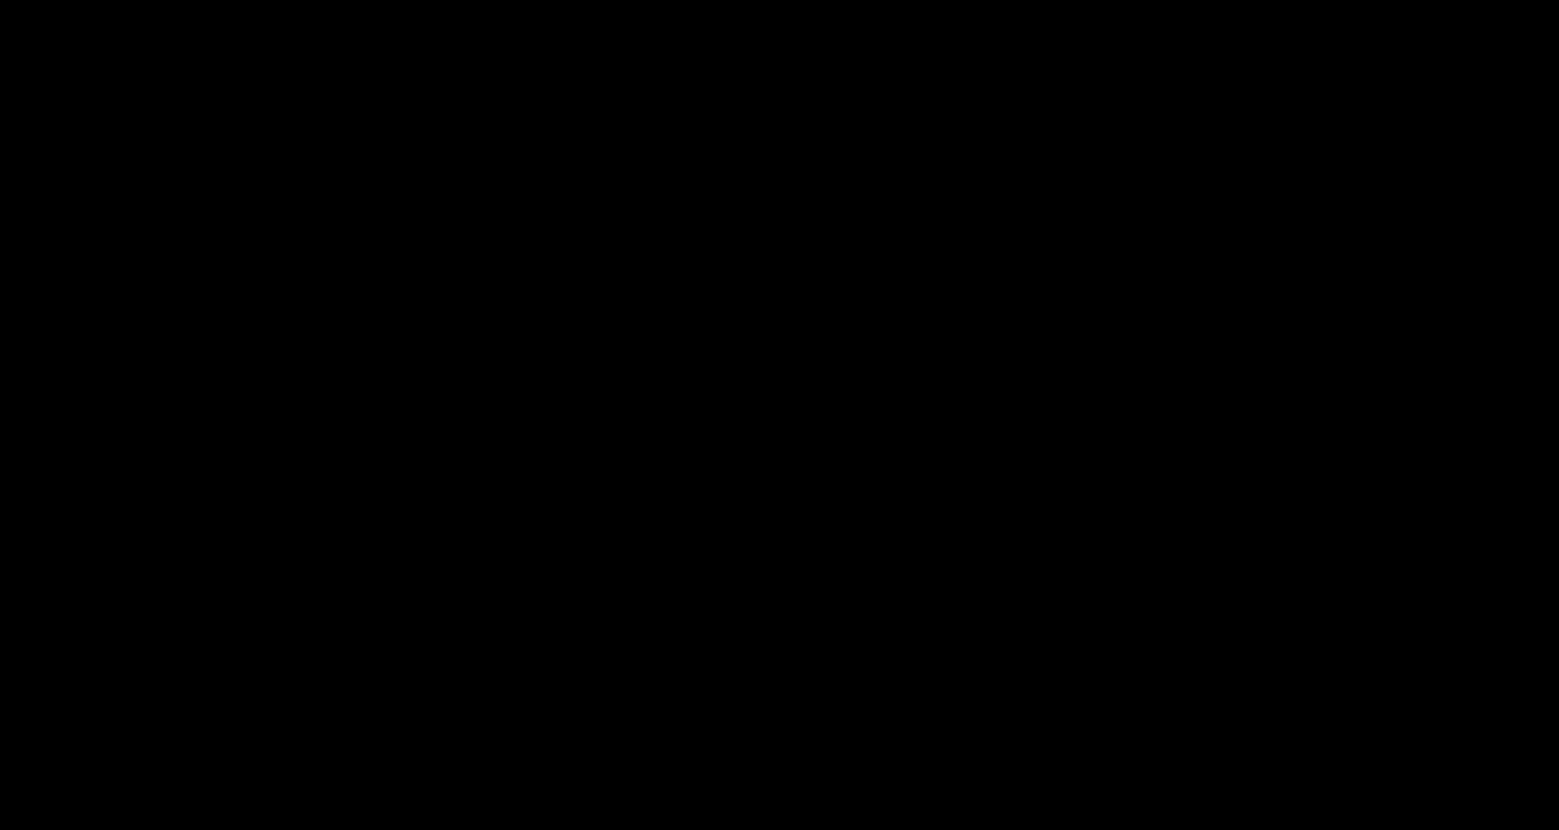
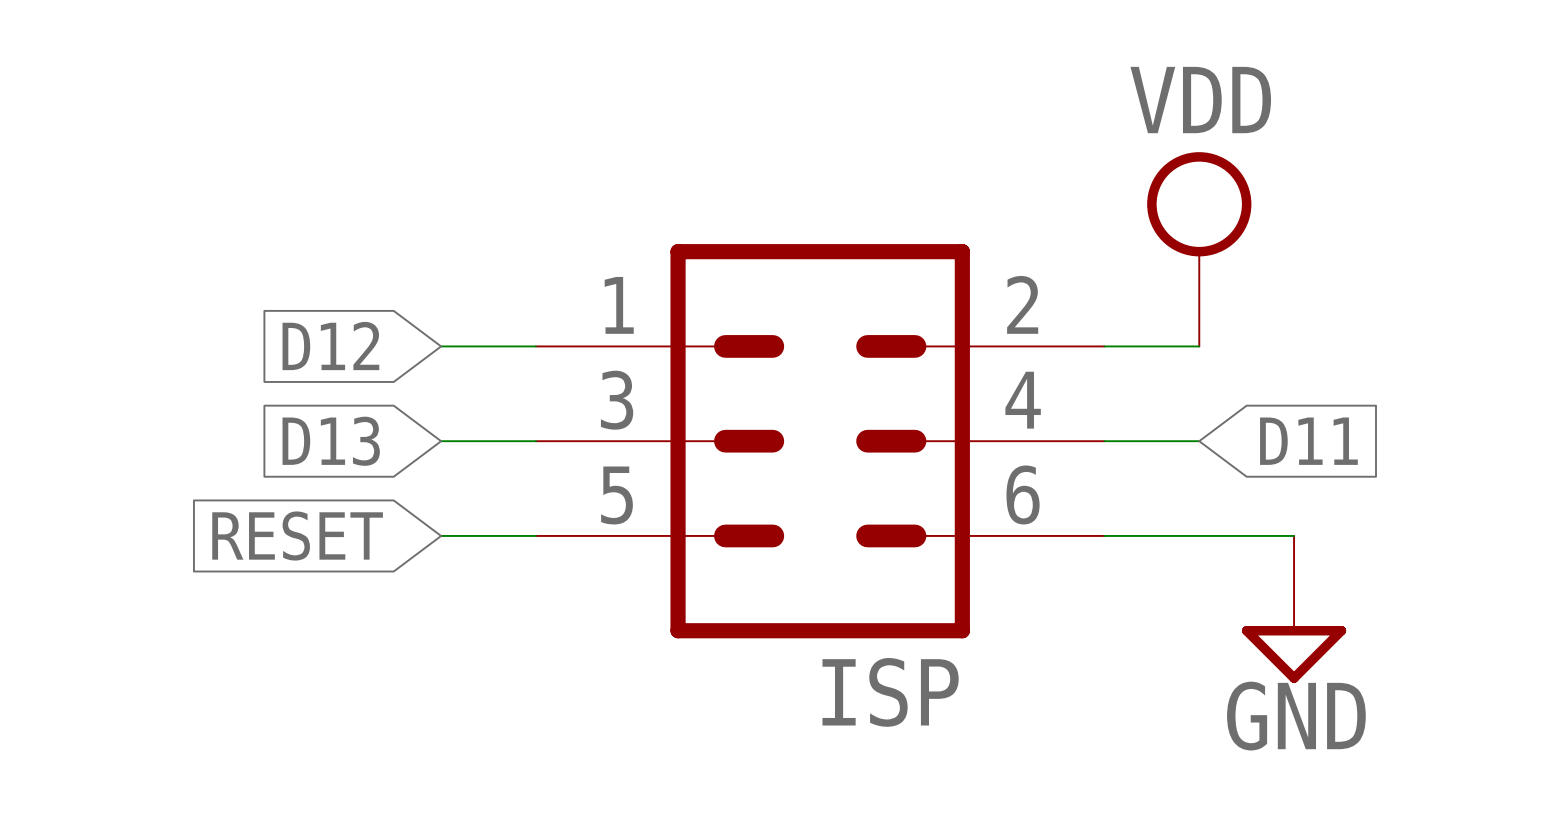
power symbol: none -> VDD (1199, 249)
global label: none -> D12 (330, 346)
wire: none -> (441, 346) (535, 346)
wire: none -> (1104, 346) (1199, 346)
global label: none -> D13 (331, 441)
wire: none -> (441, 441) (535, 441)
ISP: none -> (820, 441)
wire: none -> (1104, 441) (1199, 441)
global label: none -> D11 (1308, 441)
wire: none -> (441, 535) (535, 535)
wire: none -> (1104, 535) (1294, 535)
global label: none -> RESET (297, 536)
power symbol: none -> GND (1294, 609)

